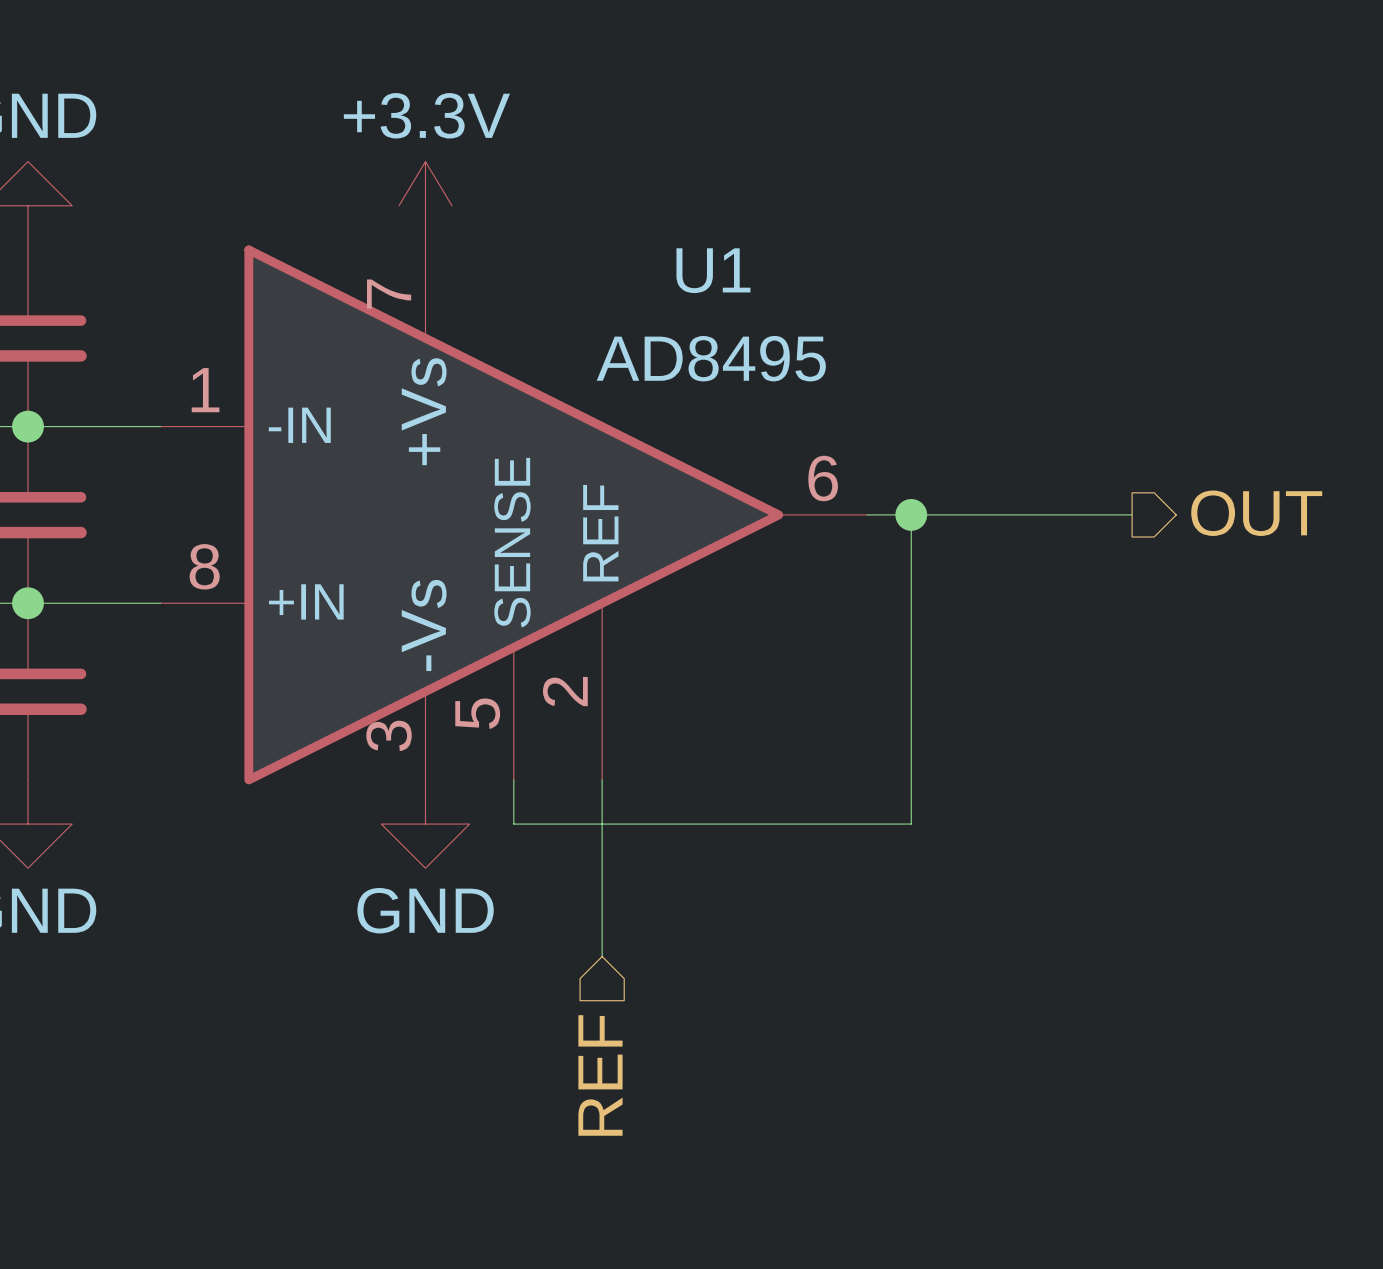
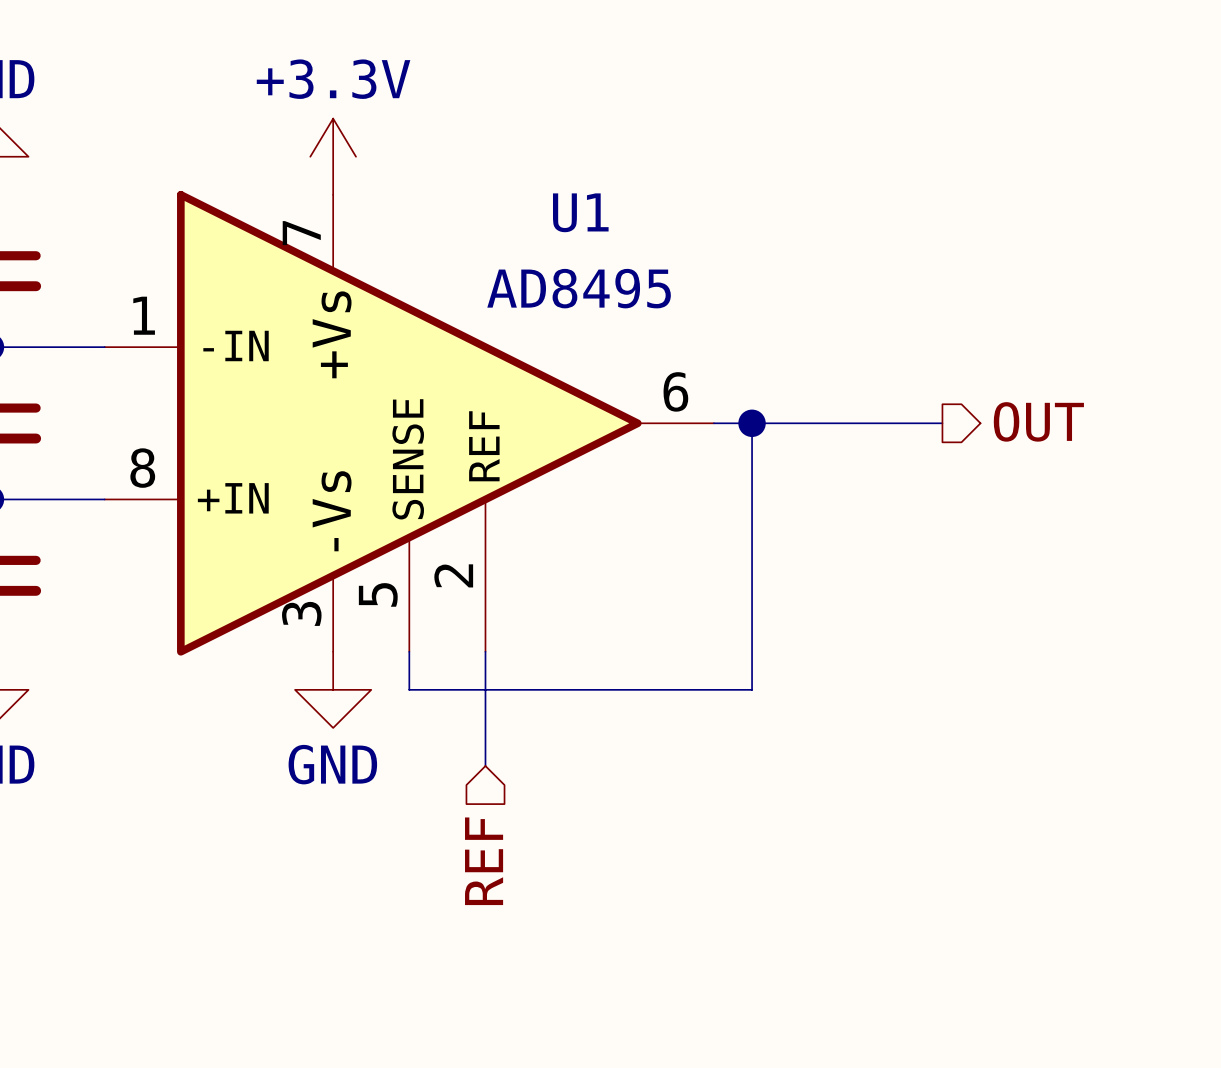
wire: (602, 912) (602, 956) -> none
hierarchical label position: REF (600, 1075) -> REF (484, 861)

